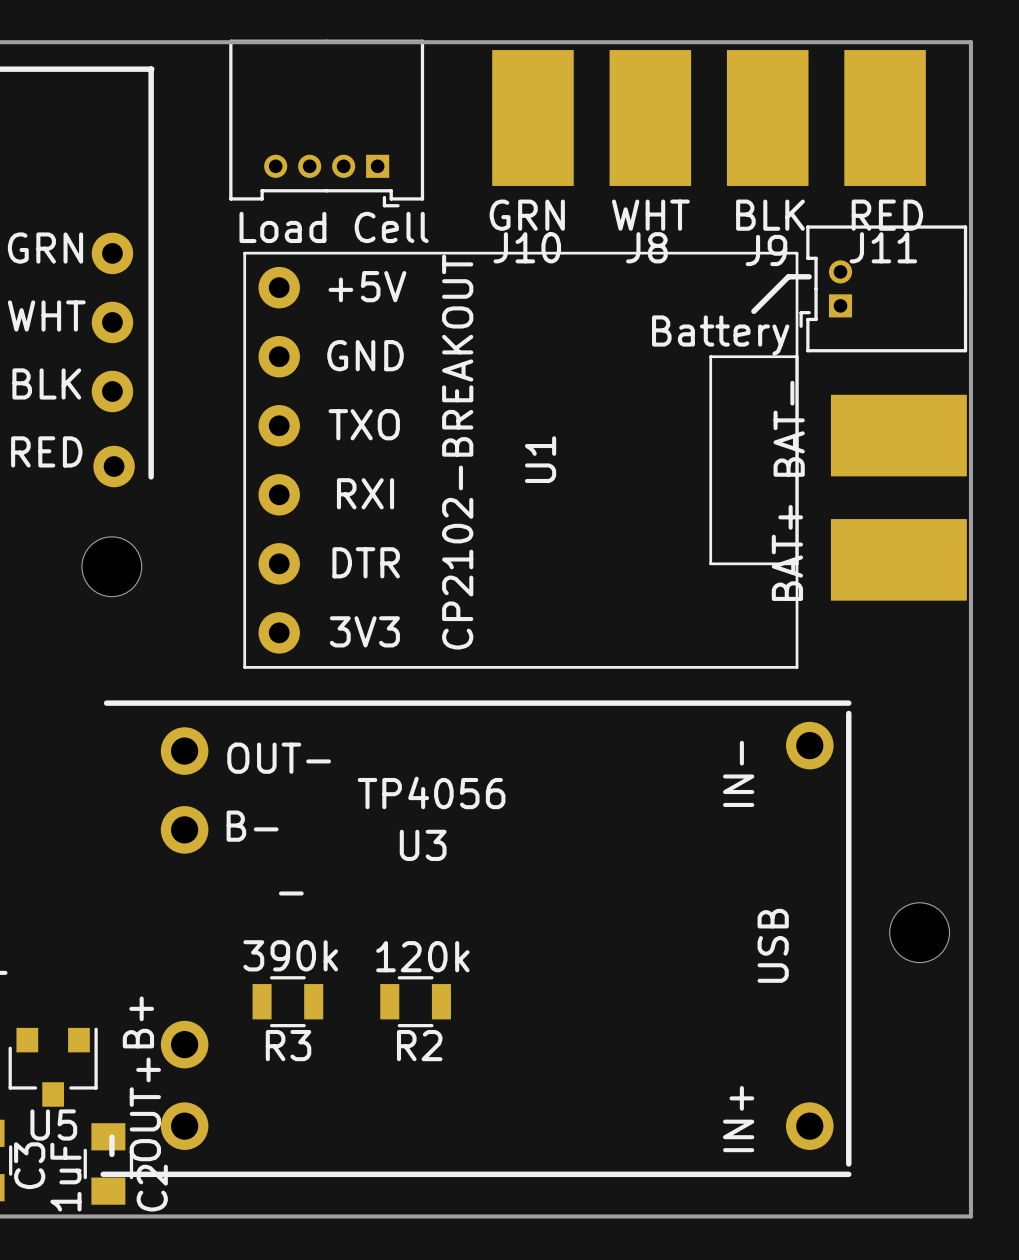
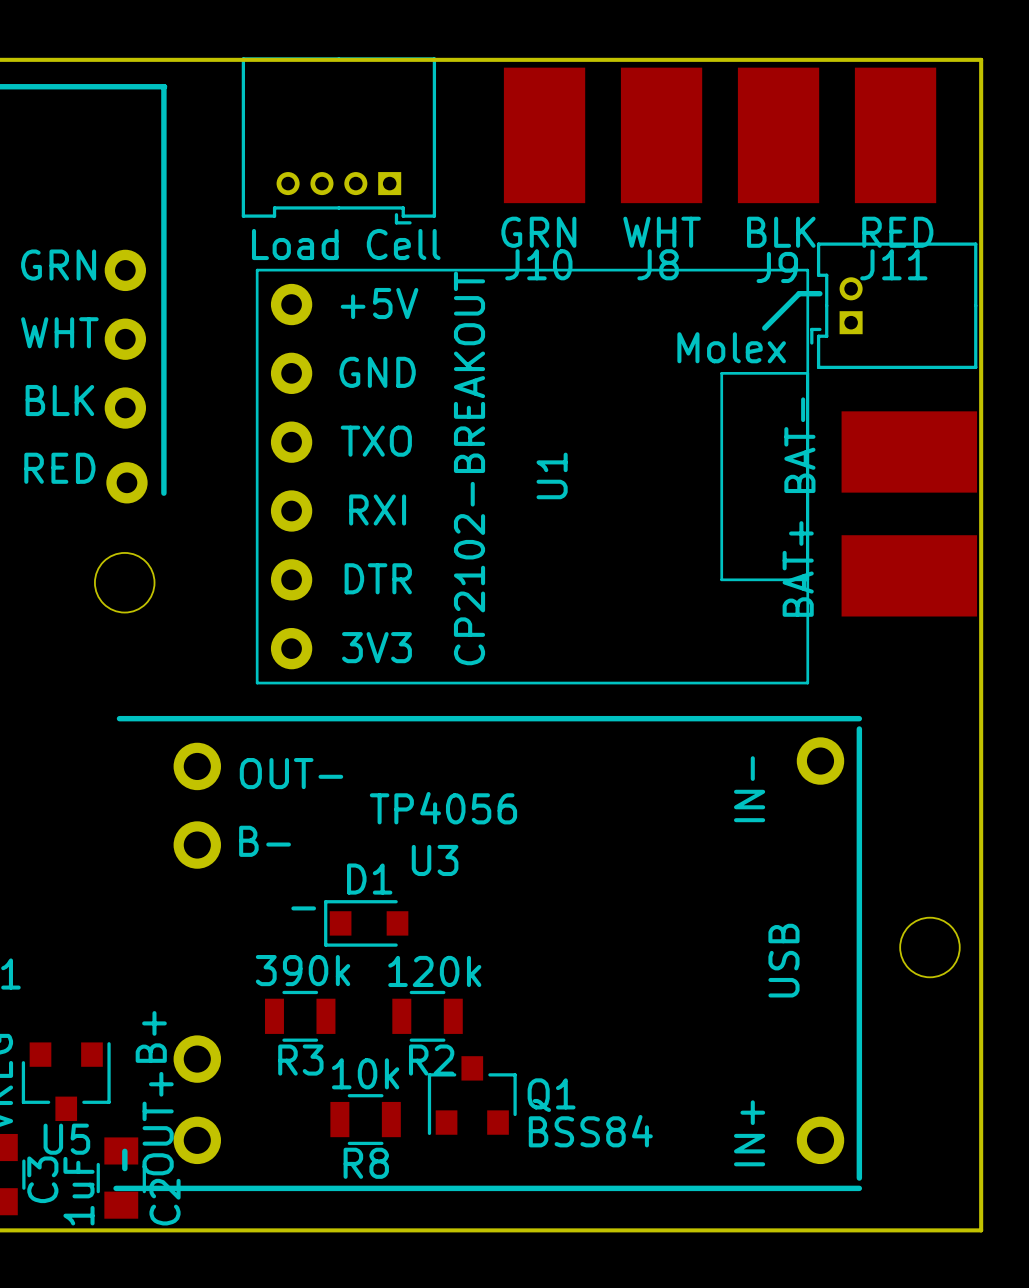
part value: Battery (720, 335) -> Molex (731, 347)
D1: none -> (366, 923)
Q1: none -> BSS84 (472, 1095)
R8: none -> 10k (365, 1119)

